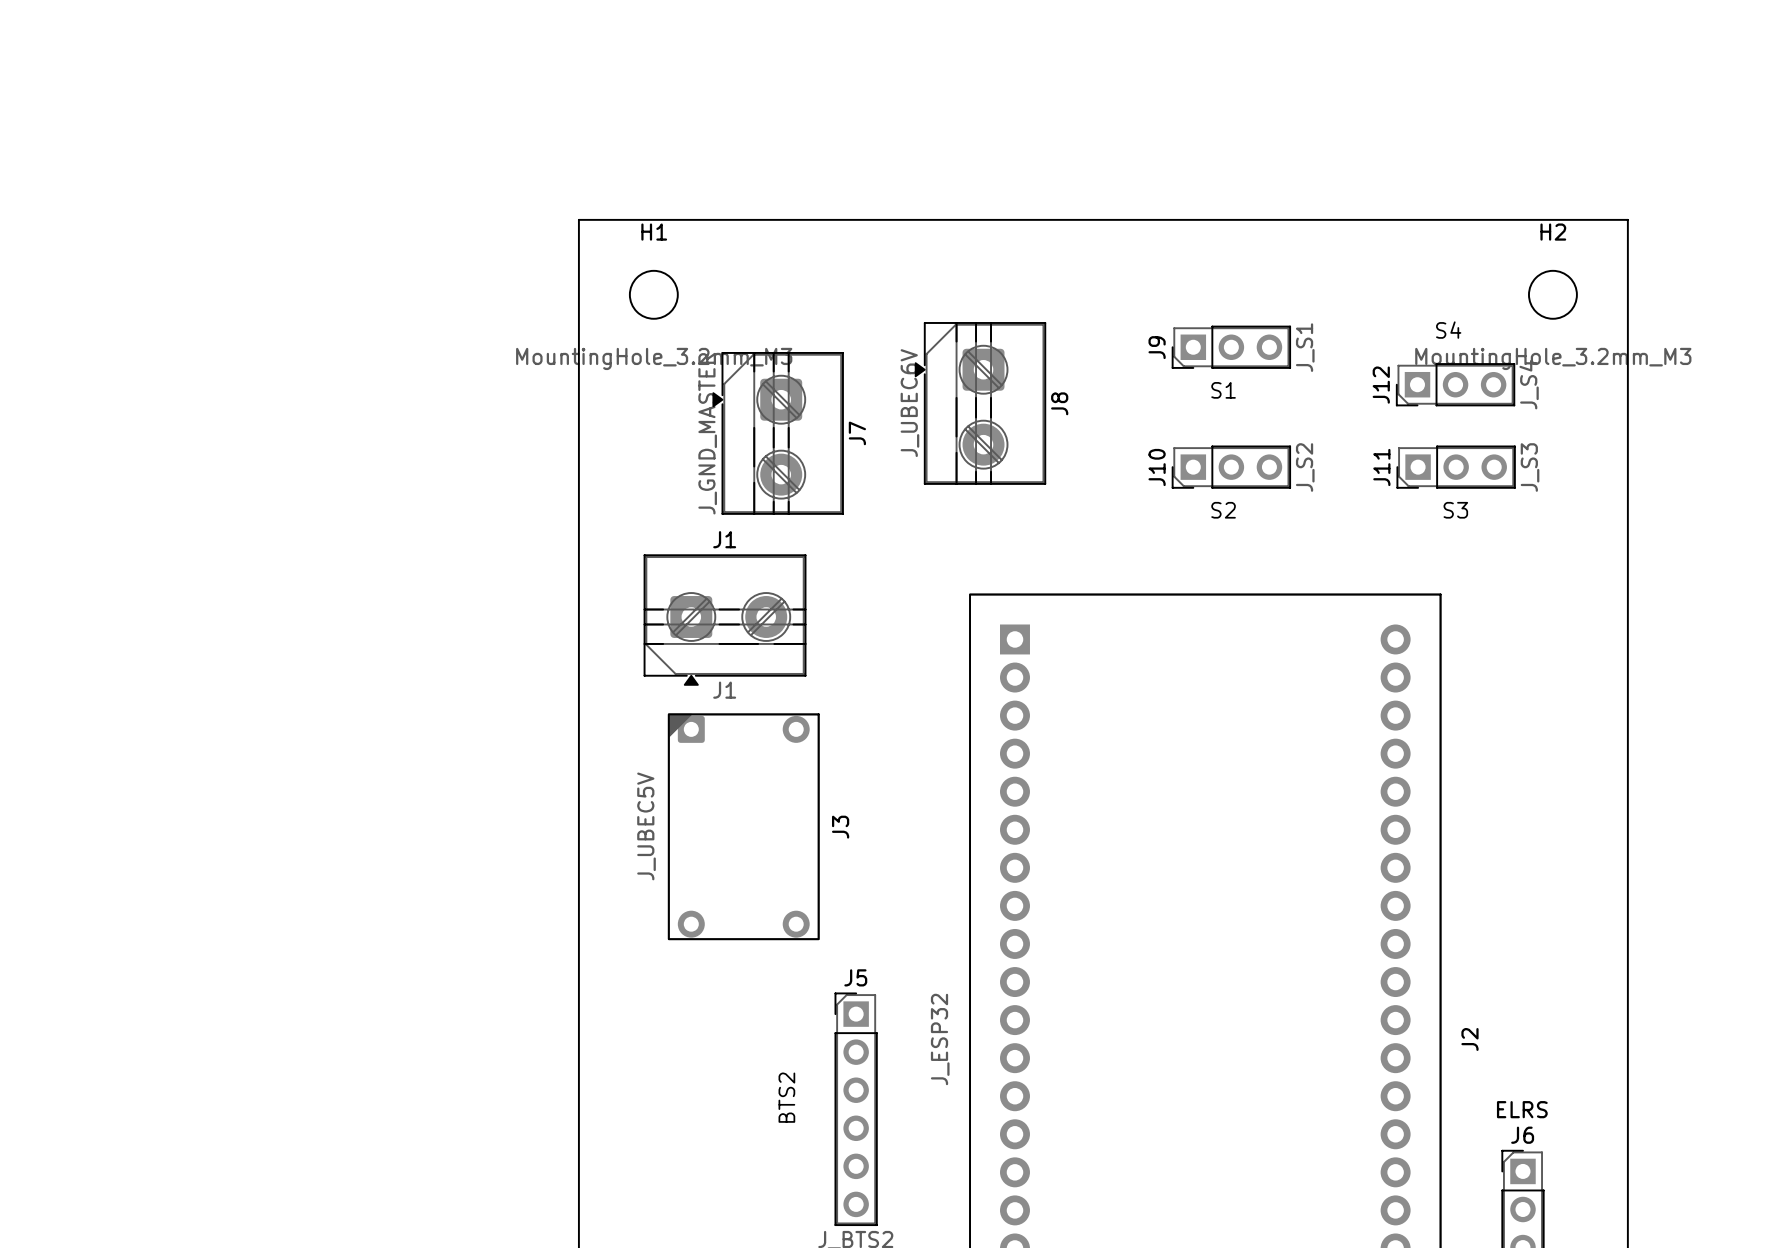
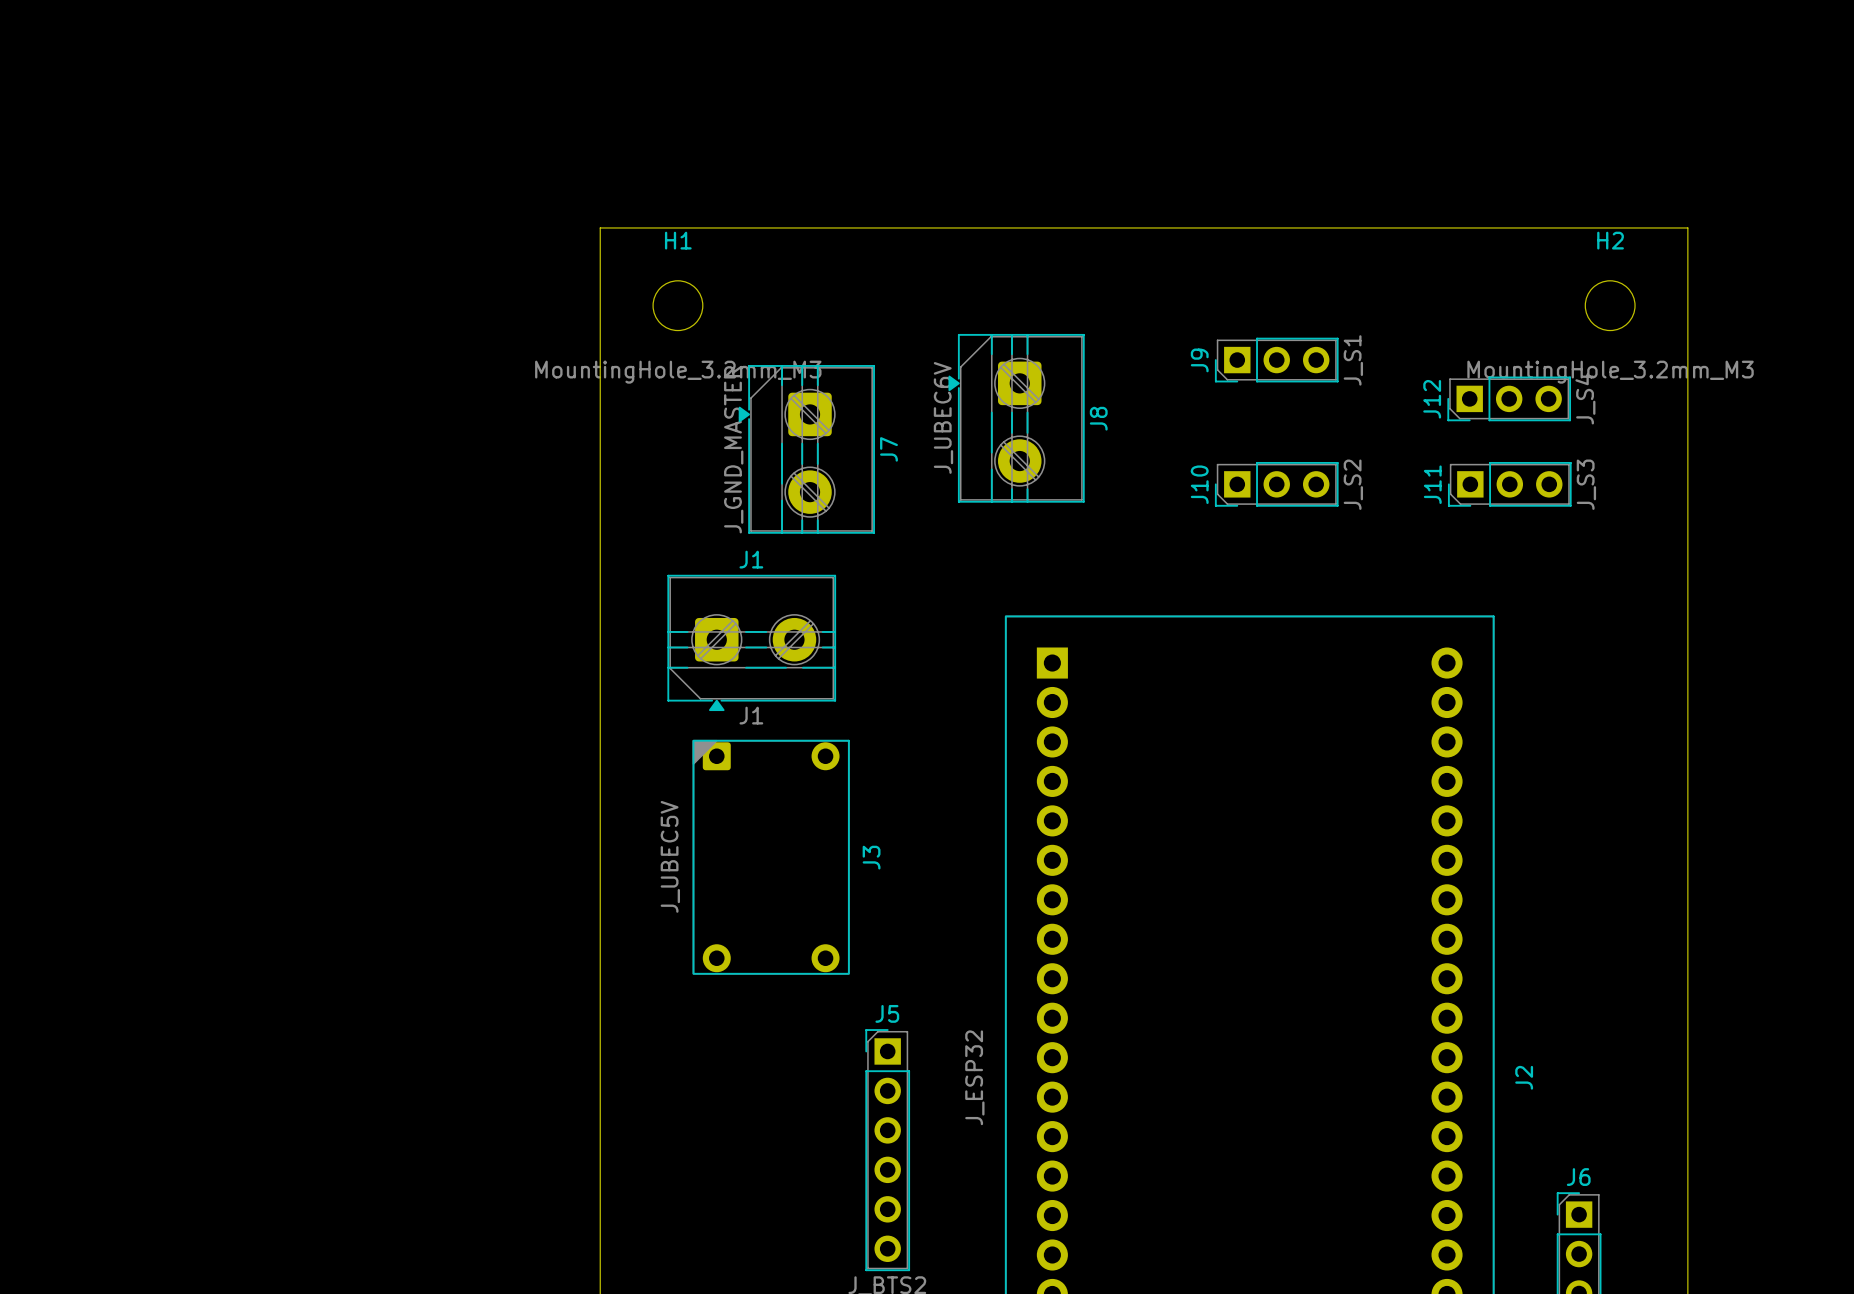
text: S4 (1448, 330) -> none
text: S1 (1223, 390) -> none
text: S2 (1223, 510) -> none
text: S3 (1455, 510) -> none
text: BTS2 (786, 1097) -> none
text: ELRS (1522, 1109) -> none

